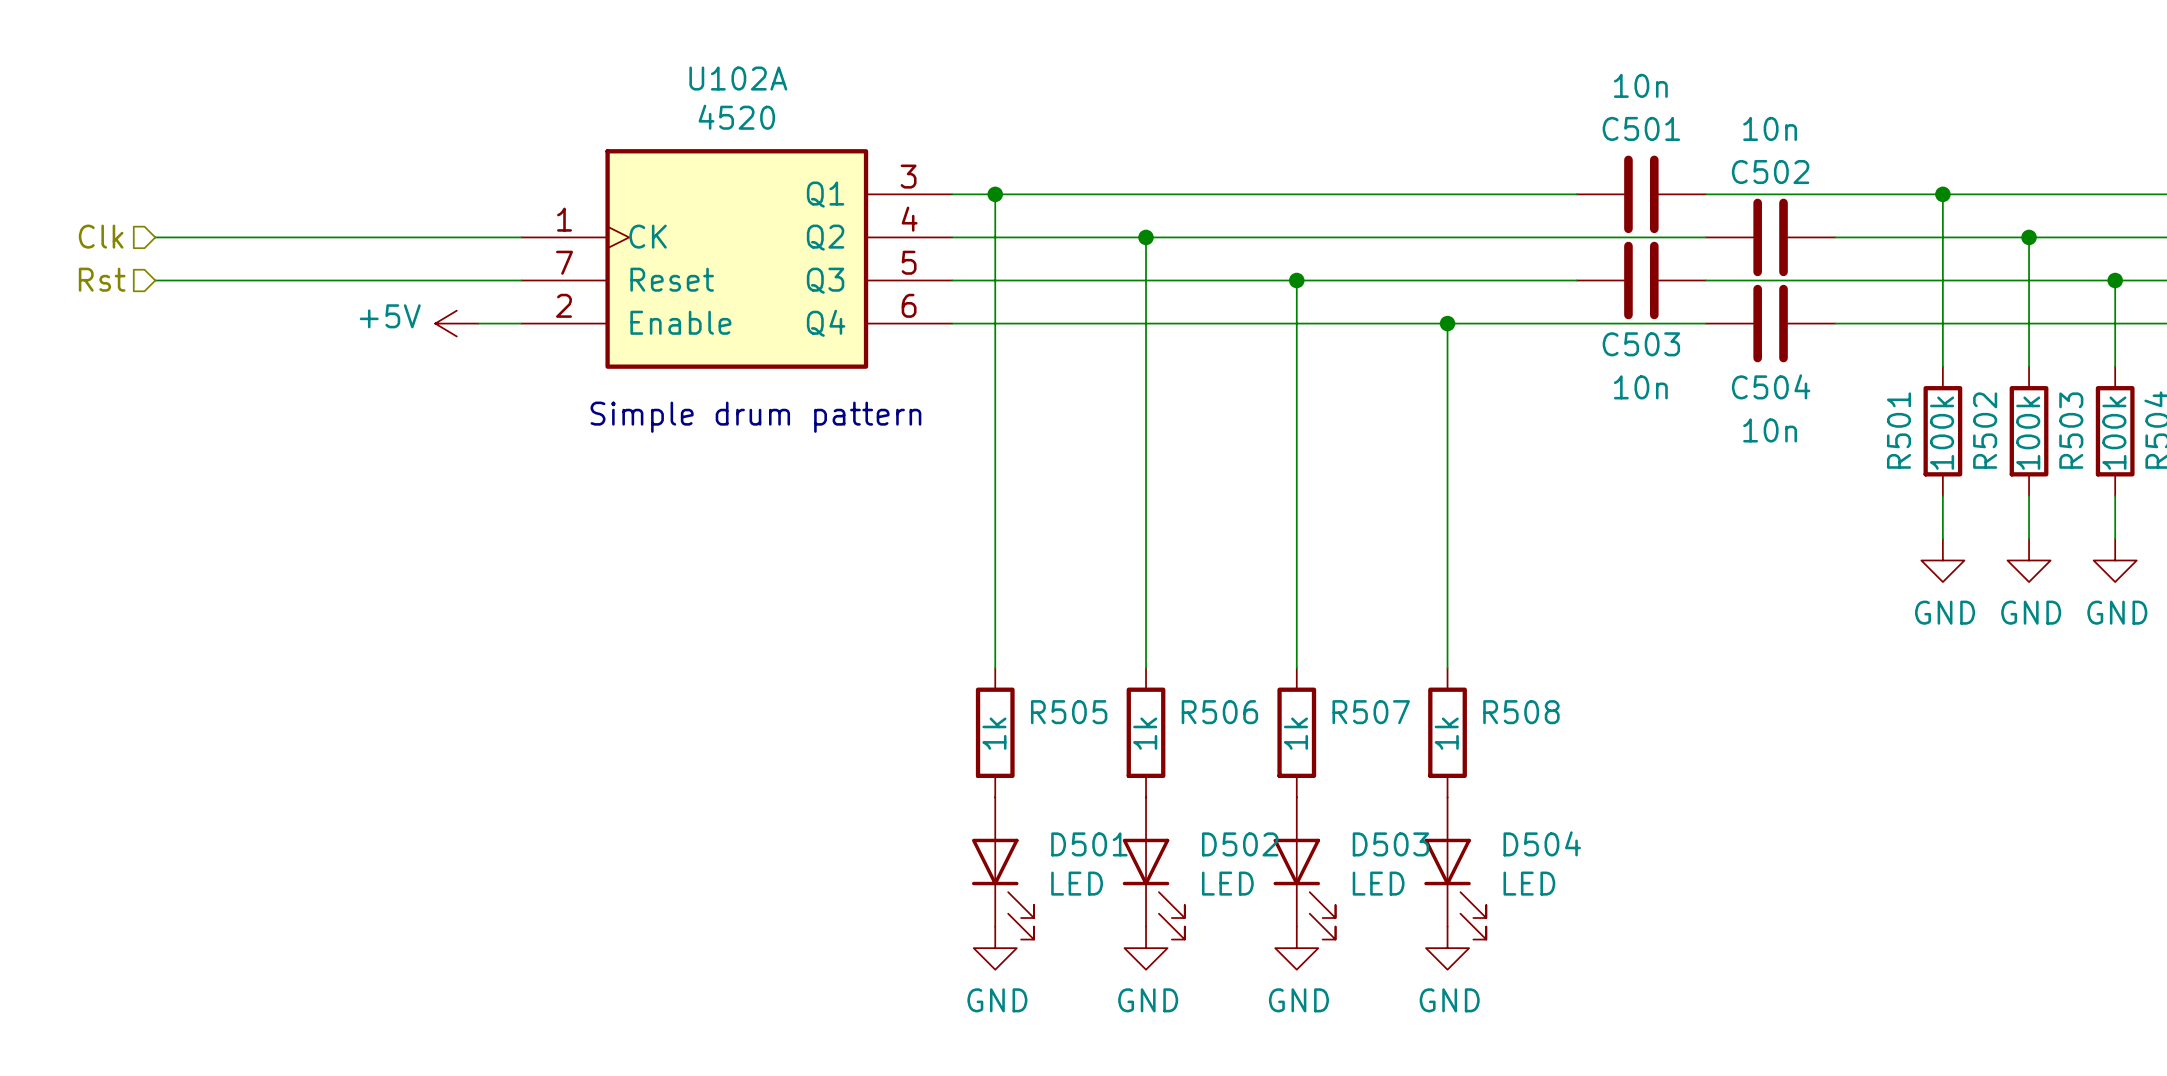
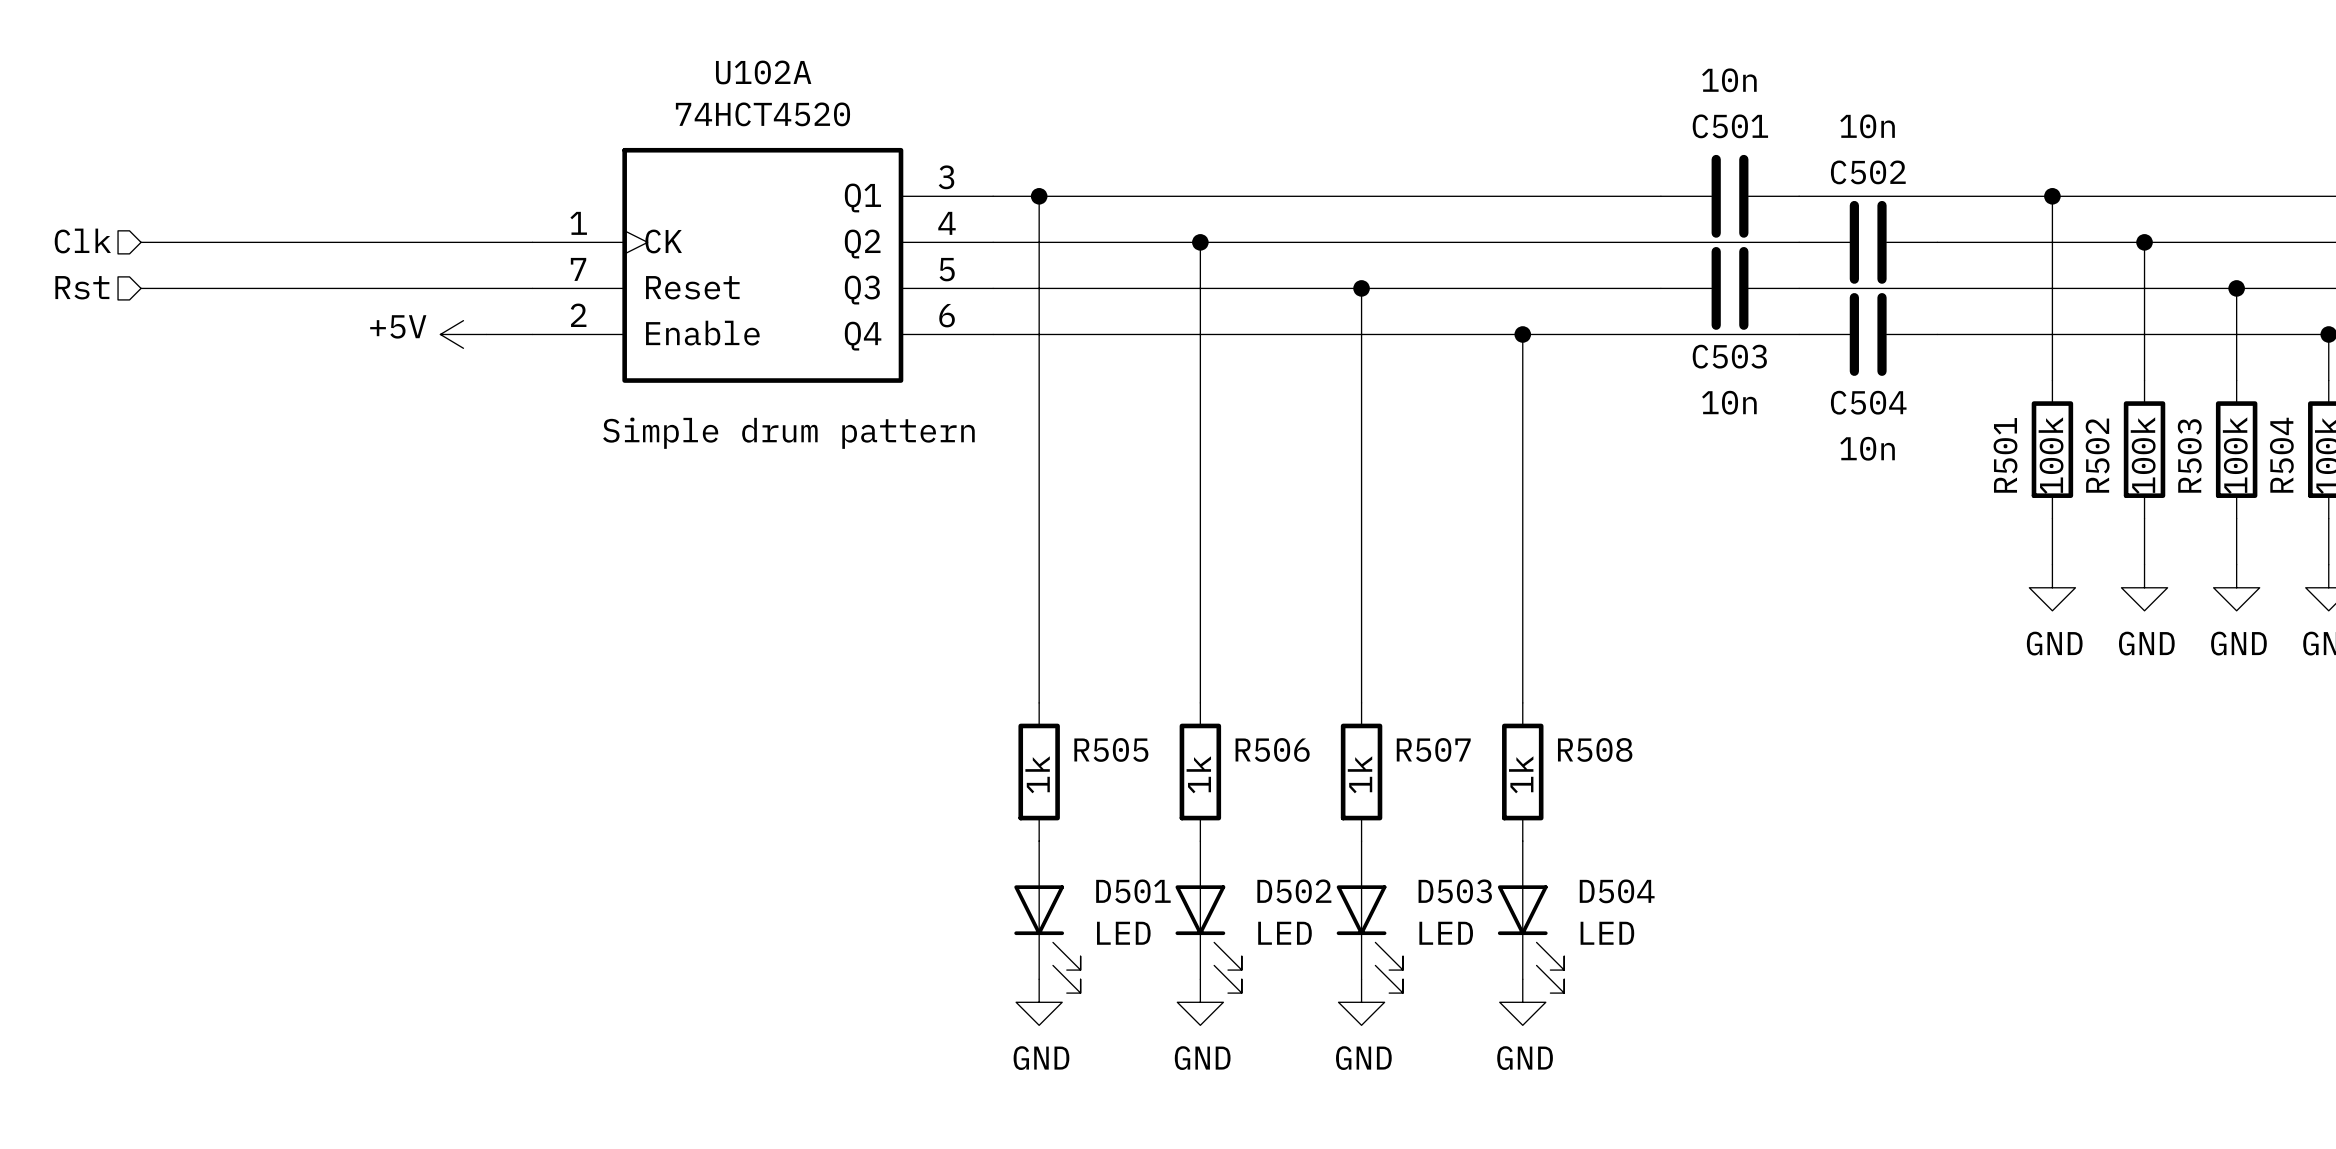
U102A value: 4520 (736, 117) -> 74HCT4520 (762, 114)

